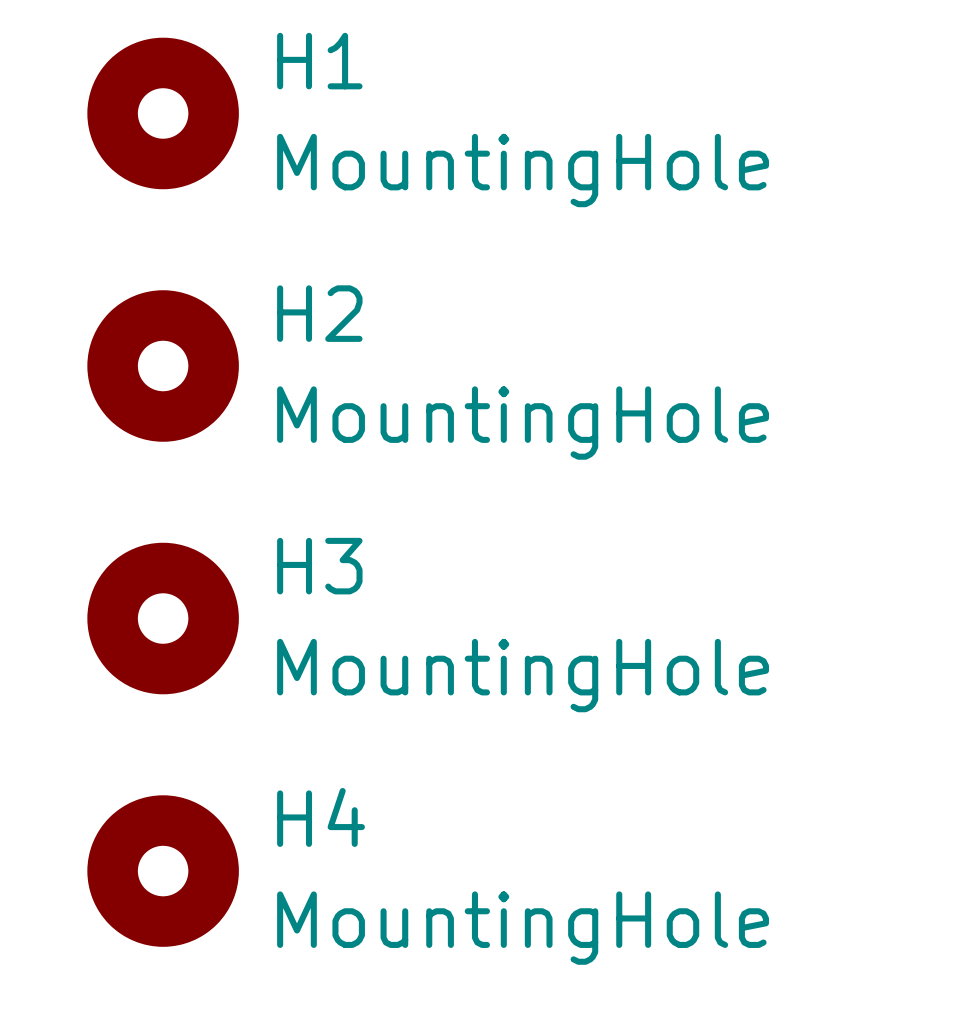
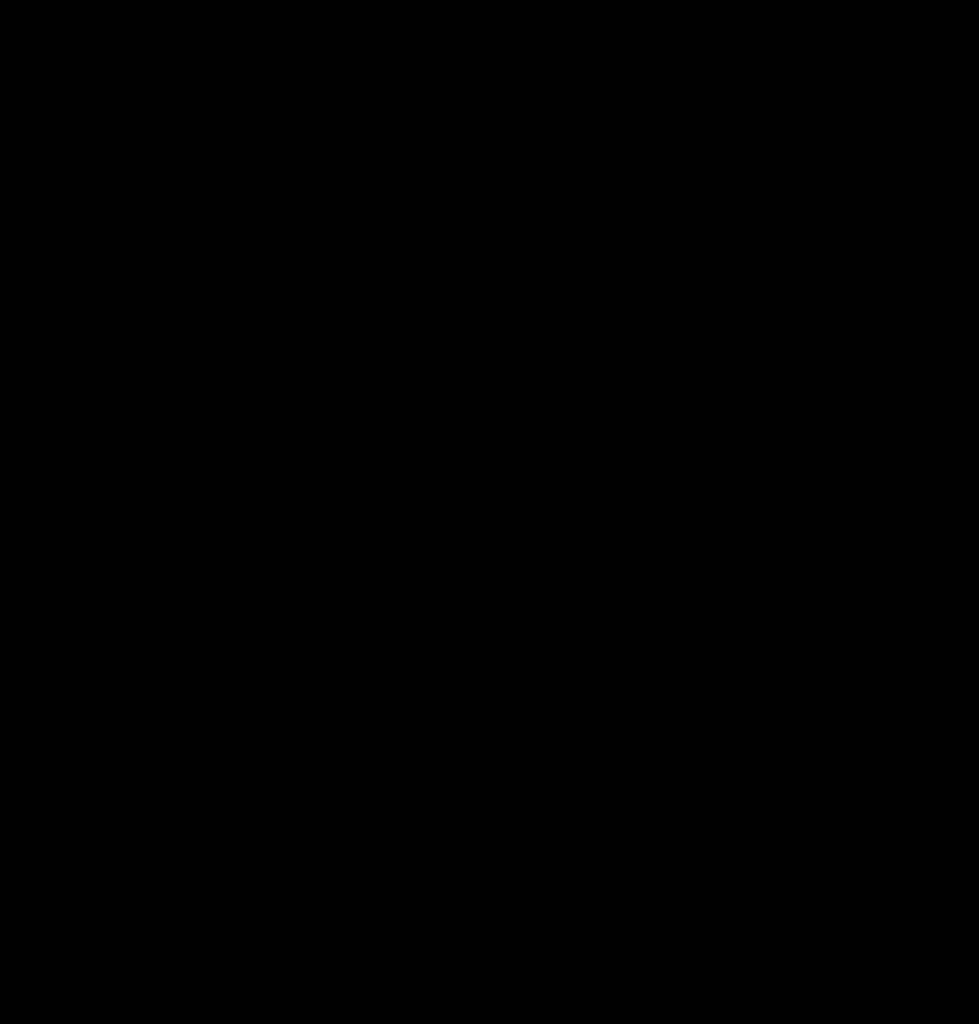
H1: MountingHole (163, 113) -> none
H2: MountingHole (163, 366) -> none
H3: MountingHole (163, 618) -> none
H4: MountingHole (163, 871) -> none

